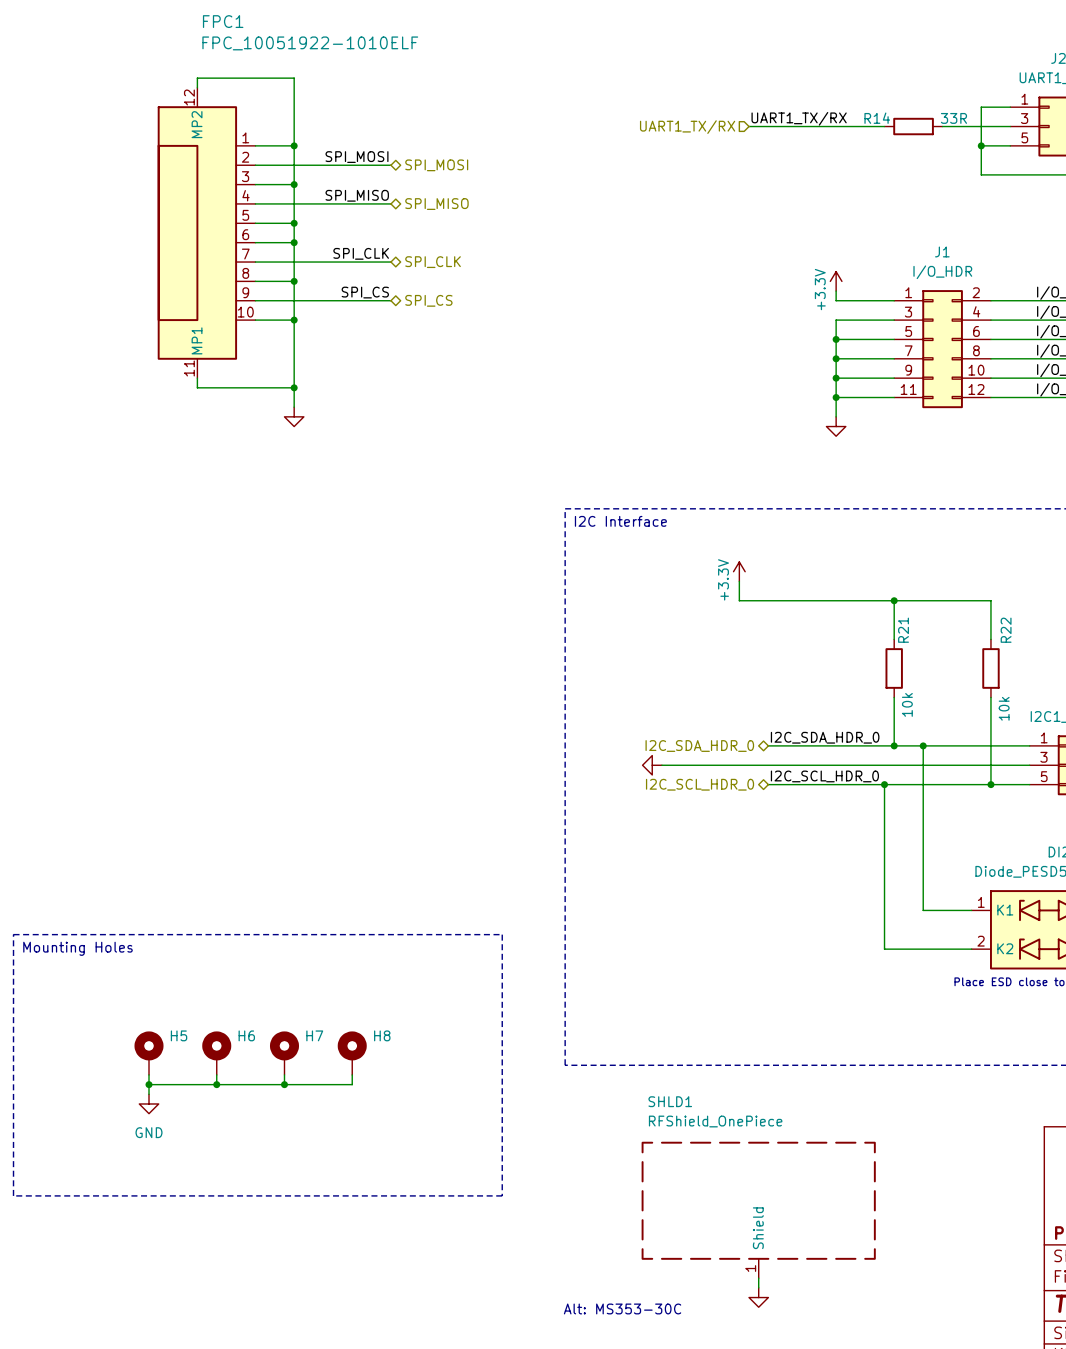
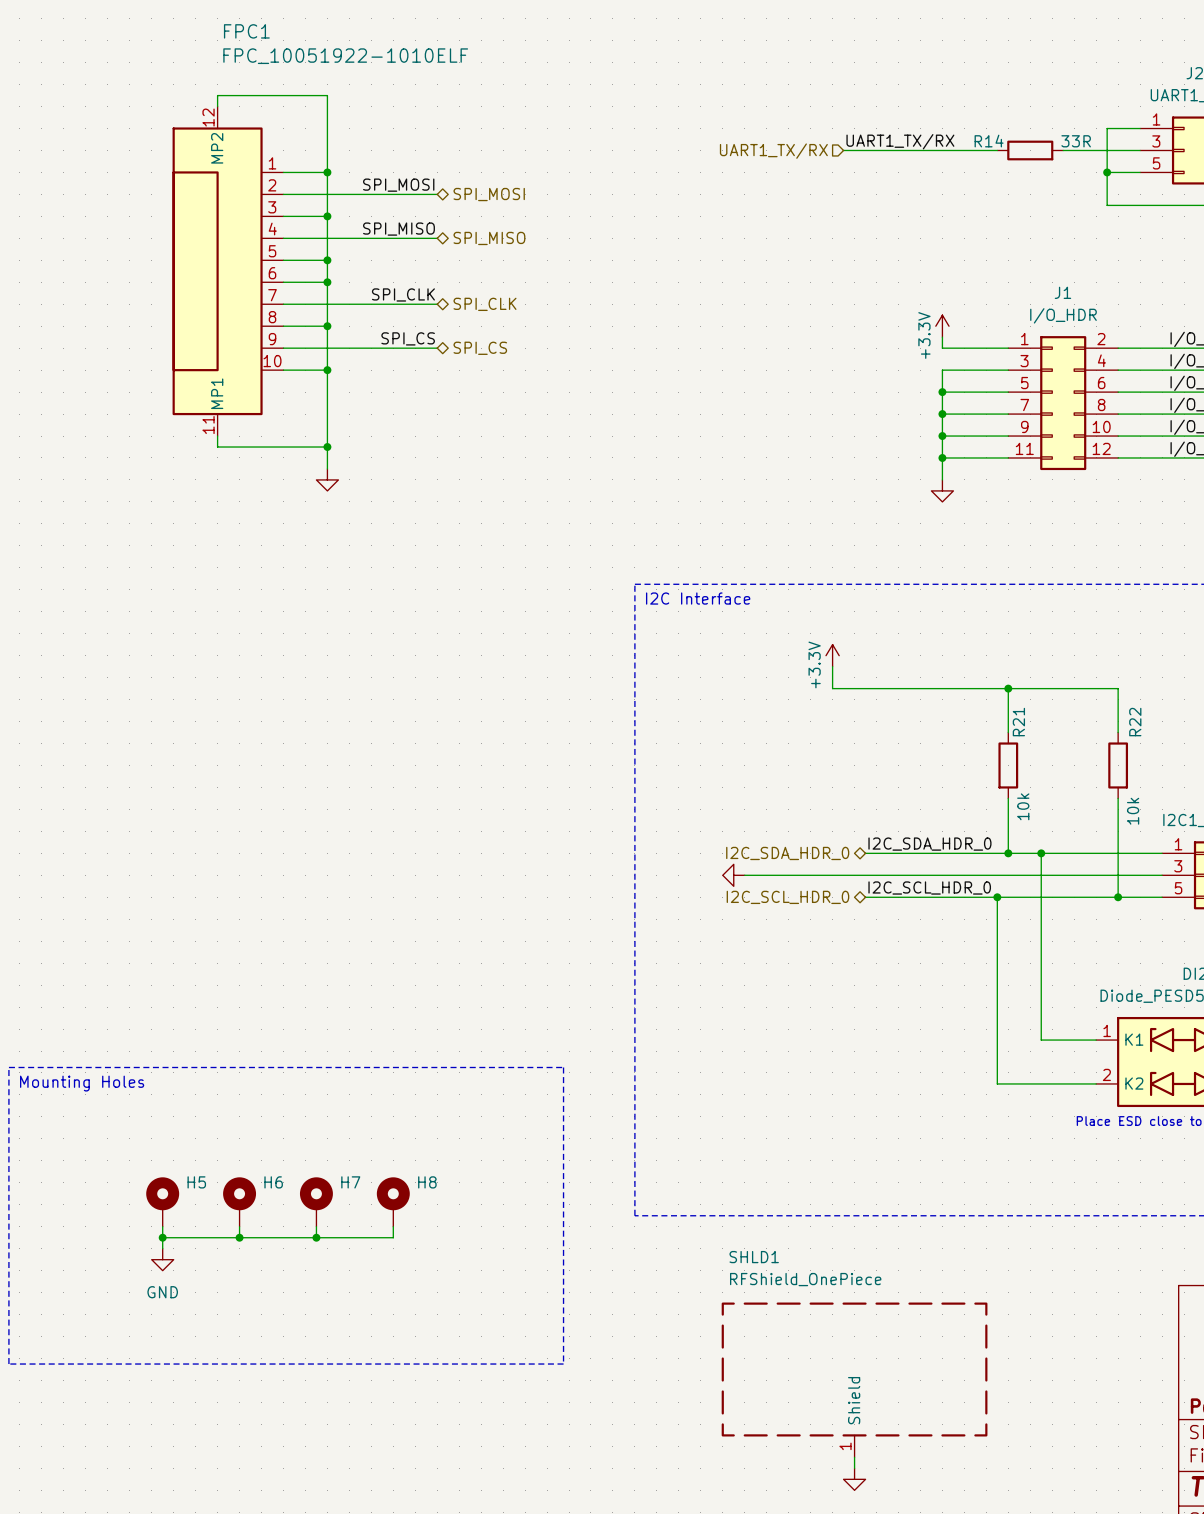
text: Alt: MS353-30C (622, 1308) -> none

